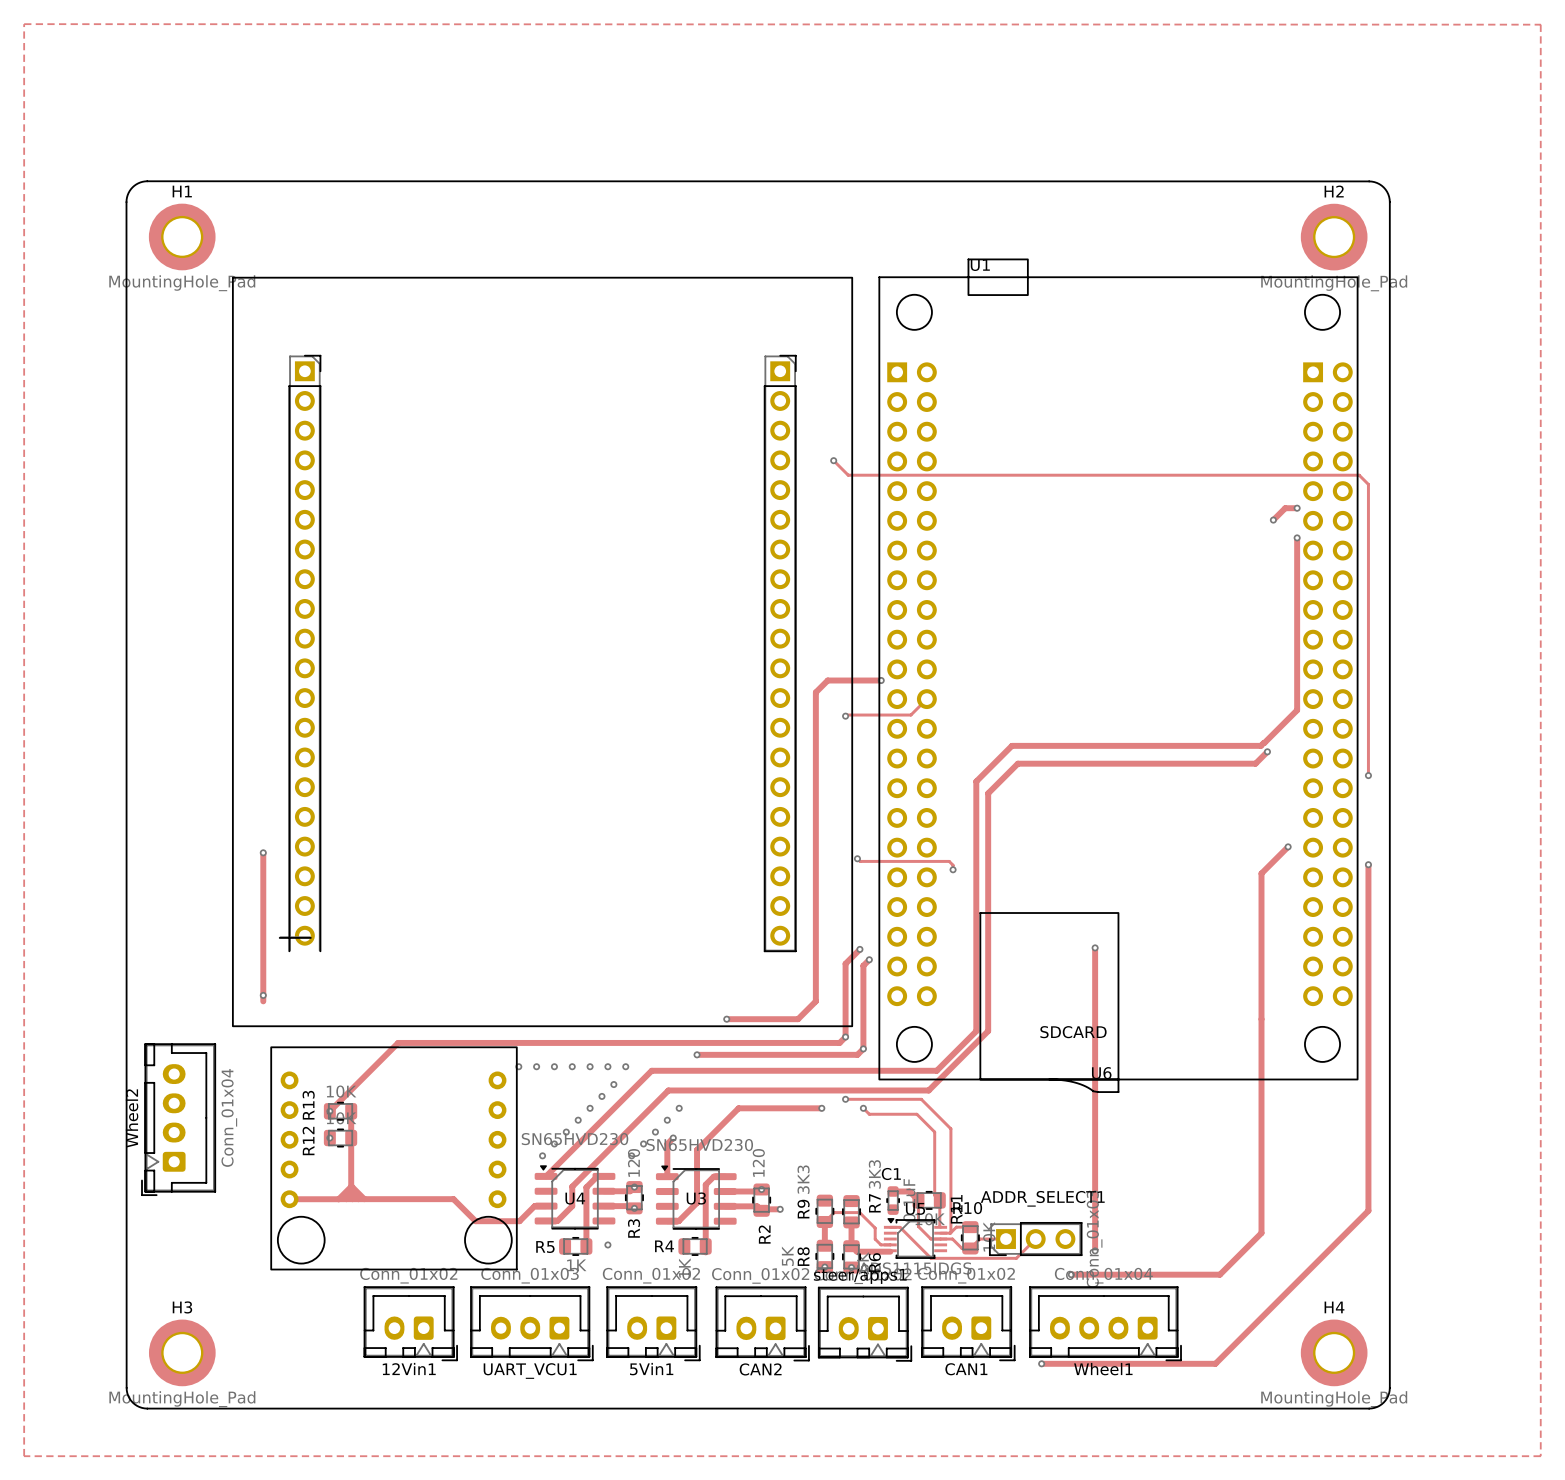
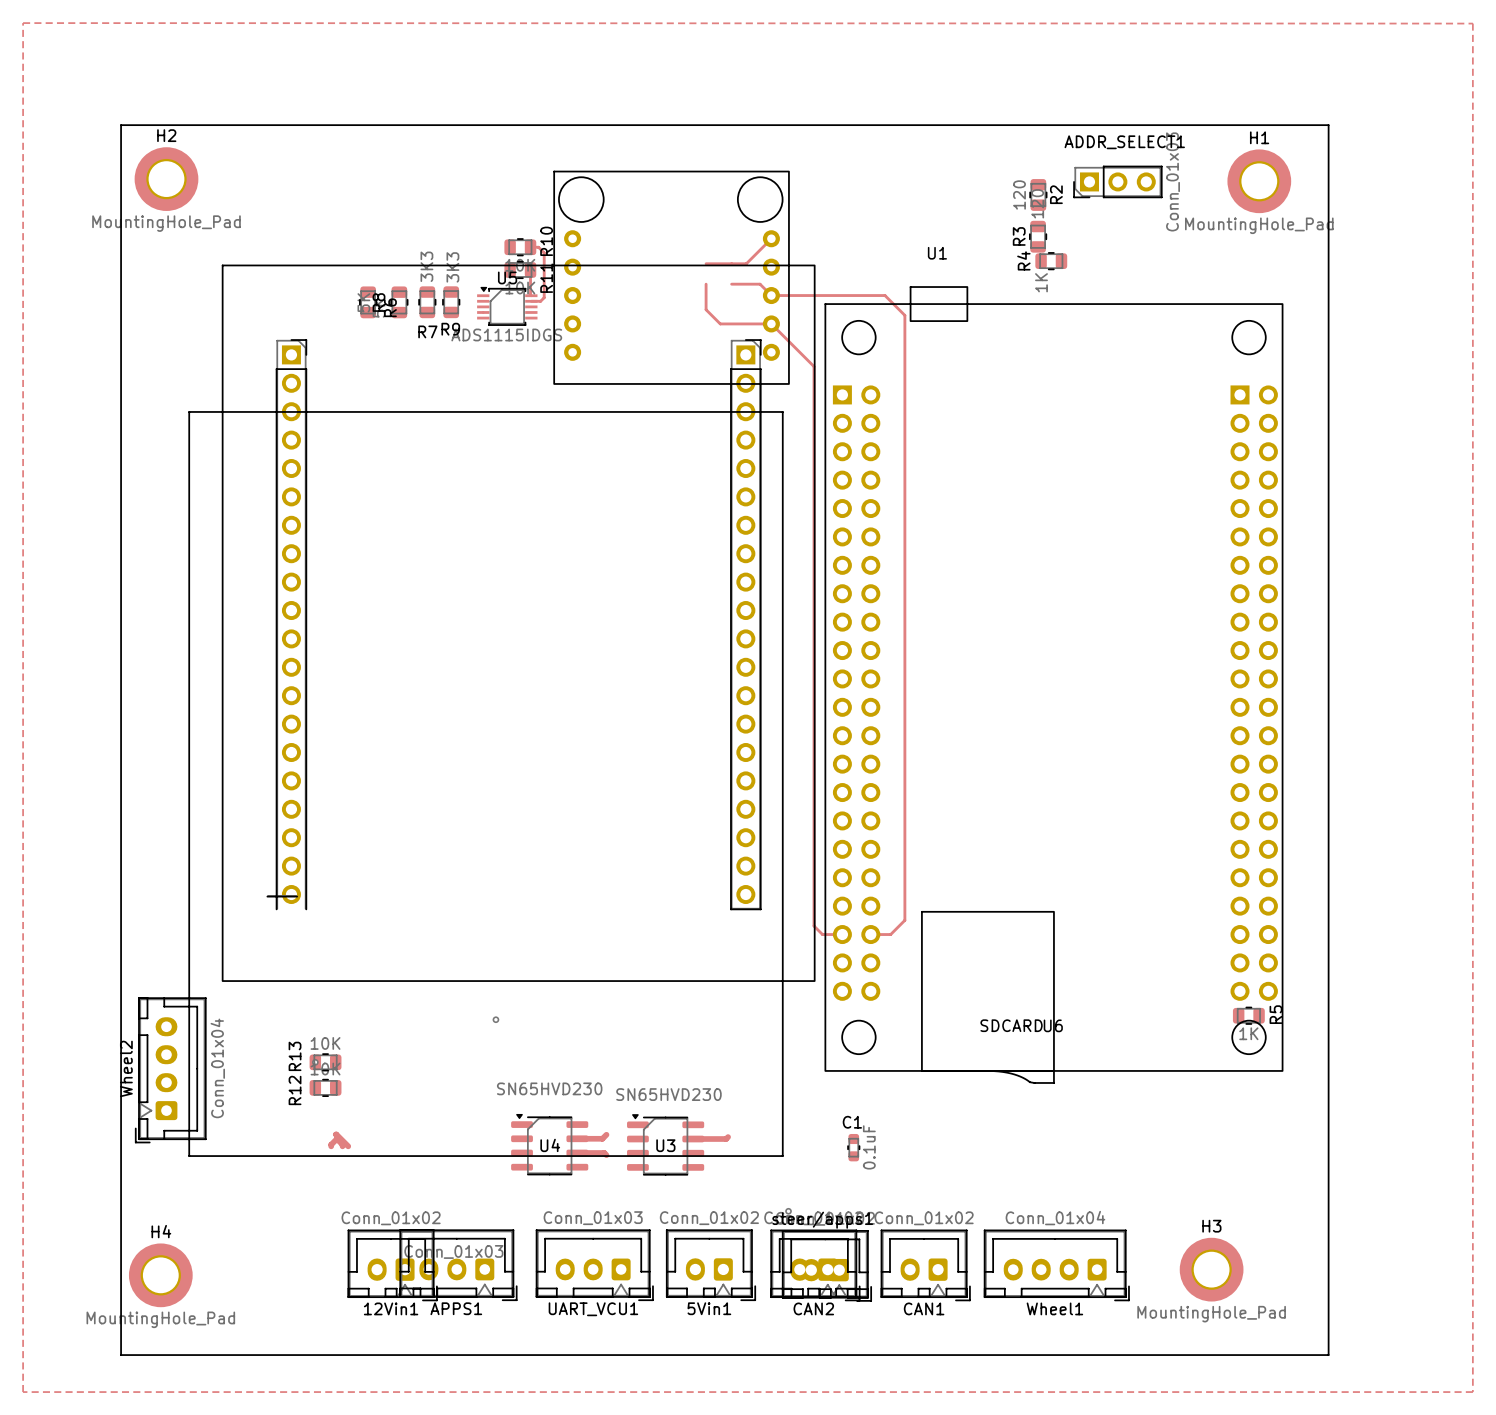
board edge: (1389, 202) (1388, 194) (1383, 187) (1377, 182) (1369, 181) (147, 181) (140, 182) (132, 187) (128, 193) (126, 202) (126, 1387) (128, 1395) (132, 1402) (139, 1407) (147, 1408) (1369, 1408) (1377, 1407) (1383, 1402) (1388, 1395) (1389, 1387) -> (1328, 193) (1328, 125) (121, 125) (121, 1355) (1328, 1355) (1328, 1326)
H1 position: (182, 236) -> (1259, 181)
H2 position: (1334, 237) -> (166, 179)
track: none -> (771, 238) (746, 263) (706, 263)
track: none -> (530, 247) (538, 247) (544, 252) (544, 297) (540, 301) (531, 301)
track: none -> (530, 269) (531, 295)
part: none -> (671, 277)
track: none -> (706, 284) (706, 309) (720, 323) (771, 323) (814, 366) (814, 926) (822, 934) (842, 934)
track: none -> (731, 284) (760, 284) (771, 295) (885, 295) (904, 315) (904, 920) (890, 934) (870, 934)
line: none -> (189, 411) (782, 411) (782, 1156) (189, 1156) (189, 411)
track: (833, 460) (848, 475) (1359, 475) (1368, 484) (1368, 775) -> none
via: (833, 460) -> none
track: (1297, 508) (1285, 508) (1273, 520) -> none
via: (1297, 508) -> none
via: (1273, 520) -> none
track: (1297, 537) (1297, 710) (1260, 745) (1011, 745) (976, 781) (976, 1031) (936, 1070) (651, 1070) (546, 1176) -> none
via: (1297, 537) -> none
U1 position: (1118, 675) -> (1053, 685)
track: (881, 680) (827, 680) (815, 692) (815, 1001) (798, 1019) (726, 1019) -> none
via: (881, 680) -> none
track: (926, 699) (910, 715) (845, 716) -> none
via: (845, 716) -> none
track: (1267, 751) (1255, 763) (1017, 763) (988, 793) (988, 1031) (928, 1090) (668, 1090) (572, 1186) (572, 1206) (557, 1220) (546, 1220) -> none
via: (1267, 751) -> none
via: (1368, 775) -> none
track: (1288, 846) (1261, 873) (1261, 1233) (1219, 1274) (1071, 1274) -> none
via: (1288, 846) -> none
track: (263, 852) (263, 1001) -> none
via: (263, 852) -> none
track: (857, 858) (860, 861) (949, 861) (953, 865) (953, 869) -> none
via: (857, 858) -> none
track: (1368, 864) (1368, 1210) (1215, 1363) (1041, 1363) -> none
via: (1368, 864) -> none
via: (953, 869) -> none
track: (1095, 947) (1095, 1250) -> none
via: (1095, 947) -> none
track: (859, 949) (845, 963) (845, 1037) (839, 1042) (398, 1042) (329, 1111) -> none
via: (859, 949) -> none
track: (869, 959) (863, 965) (863, 1048) (857, 1054) (697, 1054) -> none
via: (869, 959) -> none
via: (263, 995) -> none
via: (726, 1019) -> none
via: (845, 1037) -> none
via: (863, 1048) -> none
via: (697, 1054) -> none
via: (536, 1066) -> none
via: (554, 1066) -> none
via: (572, 1066) -> none
via: (590, 1066) -> none
via: (607, 1066) -> none
via: (625, 1066) -> none
via: (613, 1084) -> none
via: (601, 1096) -> none
track: (845, 1099) (921, 1099) (950, 1128) (950, 1232) -> none
via: (845, 1099) -> none
via: (590, 1108) -> none
via: (679, 1108) -> none
track: (821, 1108) (738, 1108) (697, 1149) (697, 1202) (678, 1221) (667, 1221) -> none
via: (821, 1108) -> none
track: (863, 1108) (869, 1114) (916, 1114) (934, 1132) (934, 1195) (939, 1200) (940, 1227) -> none
via: (863, 1108) -> none
track: (351, 1111) (351, 1186) -> none
via: (578, 1120) -> none
via: (667, 1120) -> none
via: (566, 1132) -> none
via: (655, 1132) -> none
via: (329, 1138) -> none
track: (673, 1138) (667, 1143) (667, 1176) -> none
via: (673, 1138) -> none
via: (554, 1143) -> none
via: (643, 1143) -> none
via: (542, 1155) -> none
via: (631, 1155) -> none
part: (394, 1158) -> none
R2 value position: 120 (758, 1162) -> 120 (1019, 194)
R7 value position: 3K3 (874, 1174) -> 3K3 (426, 266)
track: (603, 1176) (597, 1176) (586, 1187) (586, 1246) -> none
track: (725, 1176) (713, 1176) (705, 1184) (705, 1252) -> none
R9 value position: 3K3 (803, 1179) -> 3K3 (452, 267)
track: (351, 1186) (338, 1199) (289, 1199) -> none
via: (634, 1187) -> none
via: (761, 1189) -> none
track: (893, 1191) (909, 1191) (918, 1200) (918, 1226) (930, 1239) (952, 1239) (961, 1248) (970, 1248) (979, 1239) (1006, 1239) -> none
R3 position: (634, 1197) -> (1038, 236)
track: (338, 1199) (453, 1199) (475, 1221) (519, 1221) (534, 1206) (546, 1206) -> none
R2 position: (761, 1200) -> (1038, 194)
R11 position: (929, 1200) -> (520, 269)
R7 name rotation: 0° (874, 1203) -> 90° clockwise (427, 331)
R7 name position: R7 (874, 1203) -> R7 (427, 331)
track: (725, 1206) (757, 1206) (761, 1210) (780, 1209) -> none
via: (634, 1208) -> none
via: (780, 1209) -> none
R9 name rotation: 0° (803, 1209) -> 90° clockwise (450, 329)
R9 name position: R9 (803, 1209) -> R9 (450, 329)
R9 position: (824, 1211) -> (451, 302)
R7 position: (851, 1211) -> (427, 302)
track: (851, 1222) (851, 1246) (857, 1251) (890, 1251) -> none
track: (890, 1227) (900, 1227) (931, 1258) (1016, 1258) (1035, 1239) -> none
track: (970, 1227) (956, 1227) (950, 1233) (940, 1233) -> none
R3 name position: R3 (634, 1228) -> R3 (1019, 236)
R2 name position: R2 (764, 1234) -> R2 (1056, 194)
R10 rotation: 0° (970, 1237) -> 90° clockwise (520, 247)
R10 position: (970, 1237) -> (520, 247)
U5 position: (915, 1238) -> (507, 306)
ADDR_SELECT1 position: (1035, 1239) -> (1117, 181)
via: (607, 1244) -> none
track: (890, 1244) (880, 1244) (875, 1239) (875, 1228) (859, 1212) (834, 1212) (824, 1221) (824, 1245) -> none
R5 position: (575, 1246) -> (1248, 1015)
R4 name rotation: 0° (664, 1246) -> 90° counterclockwise (1023, 260)
R4 position: (695, 1246) -> (1051, 261)
R5 name rotation: 0° (545, 1247) -> 90° counterclockwise (1275, 1014)
R5 name position: R5 (545, 1247) -> R5 (1275, 1014)
via: (1095, 1250) -> none
R8 position: (824, 1256) -> (399, 302)
R6 position: (851, 1256) -> (368, 302)
via: (851, 1267) -> none
via: (1071, 1274) -> none
APPS1: none -> Conn_01x03 (458, 1265)
UART_VCU1 position: (531, 1323) -> (594, 1265)
5Vin1 position: (653, 1323) -> (711, 1265)
CAN2 position: (762, 1323) -> (815, 1265)
H3 position: (182, 1352) -> (1211, 1269)
H4 position: (1334, 1352) -> (160, 1275)
via: (1041, 1363) -> none

